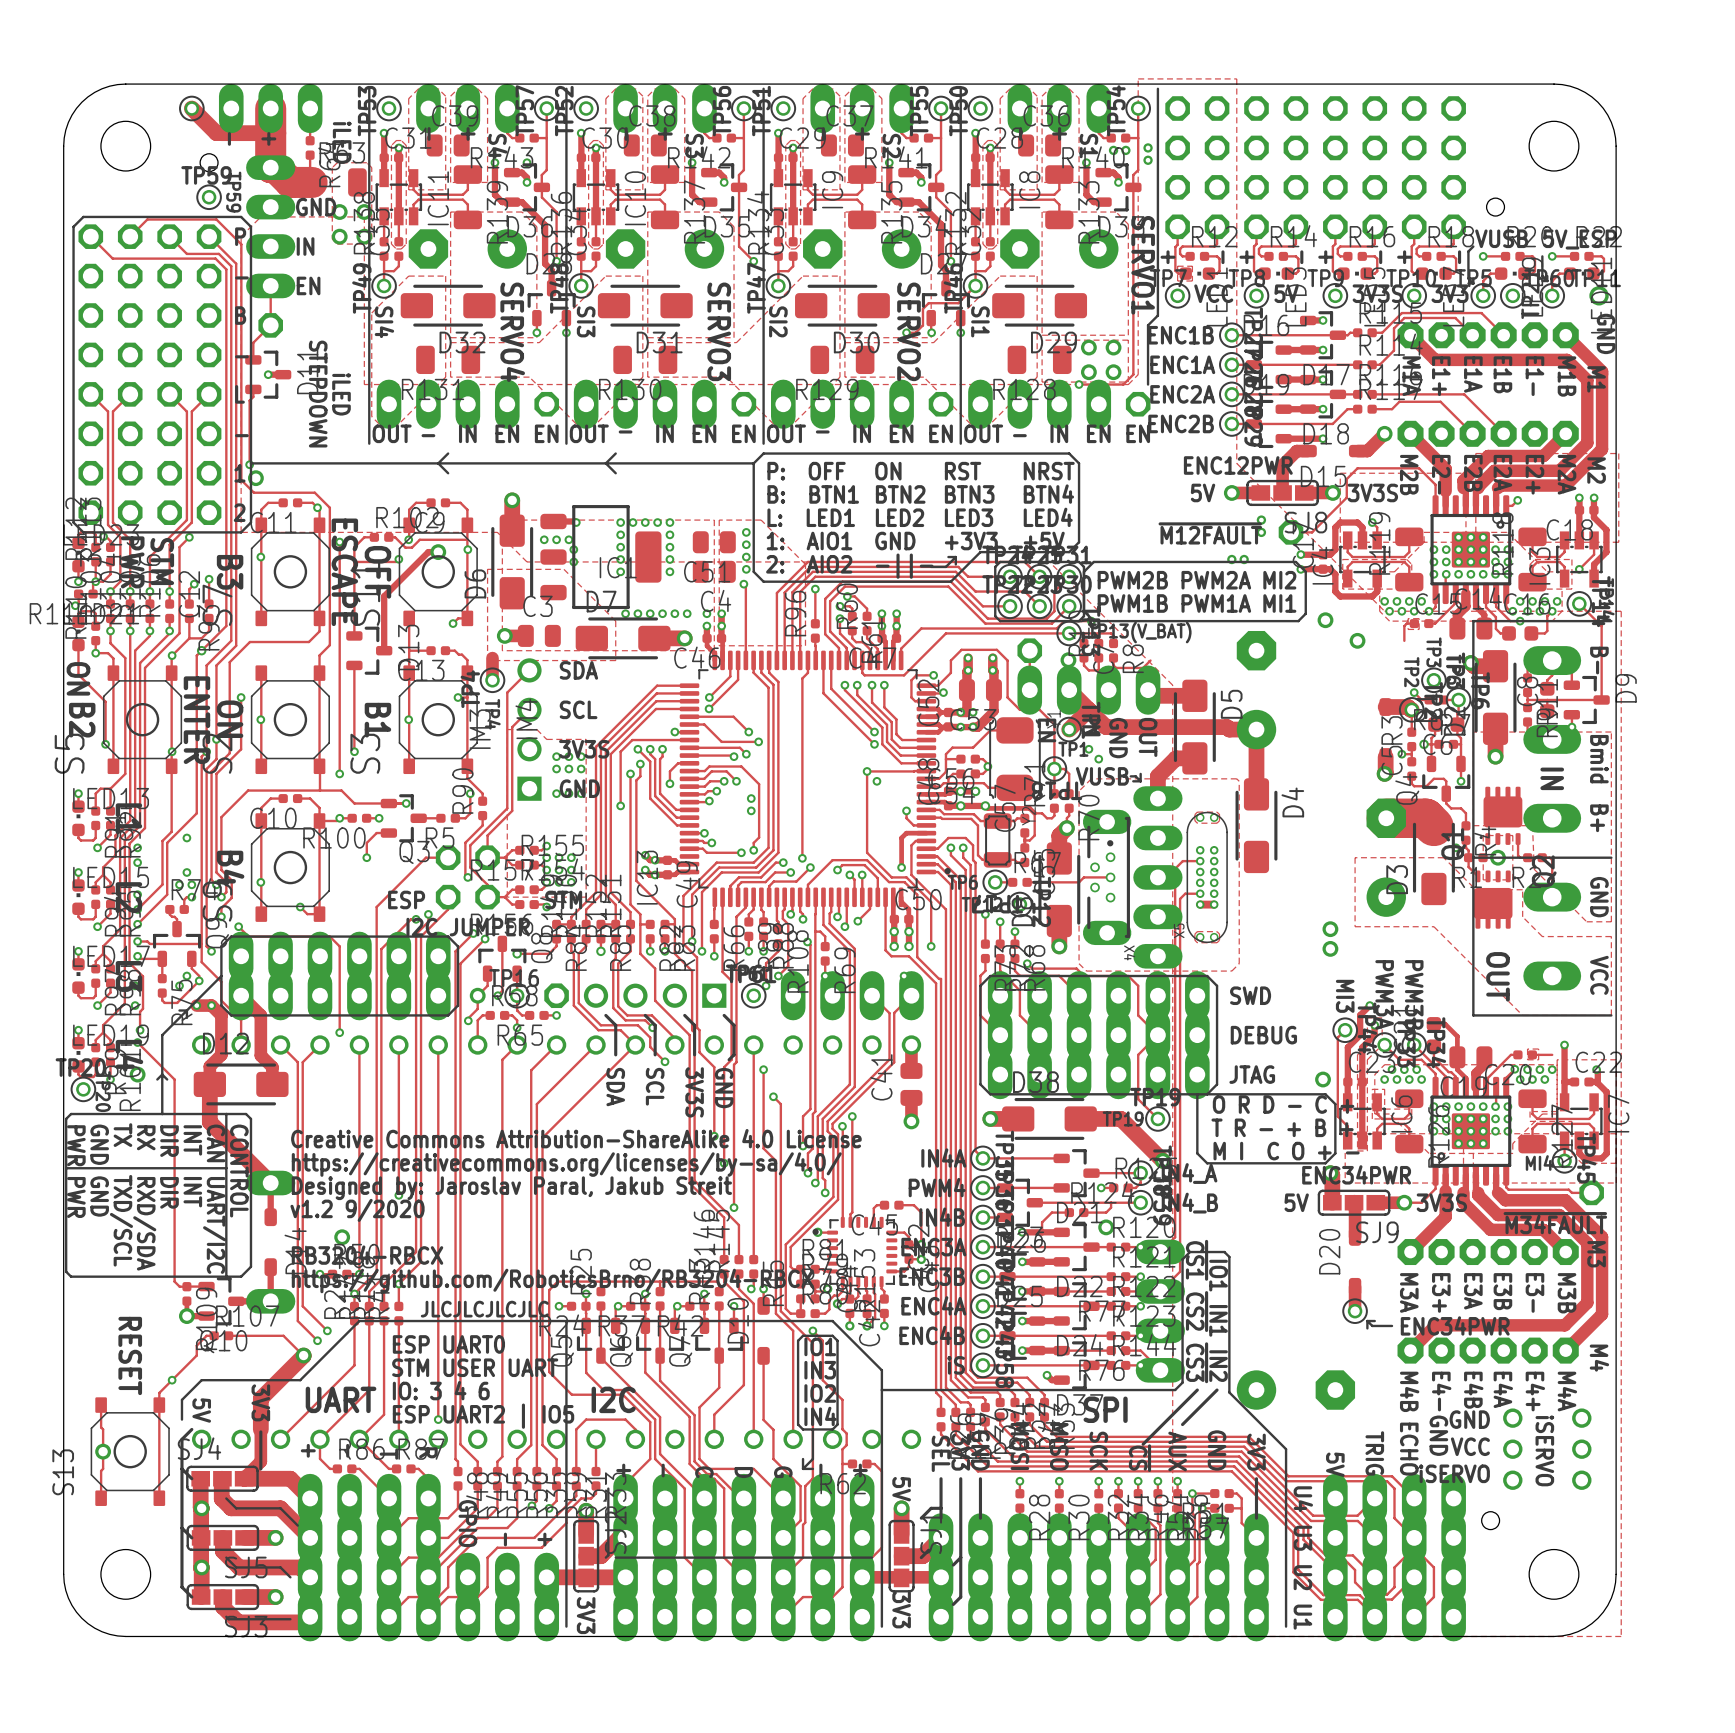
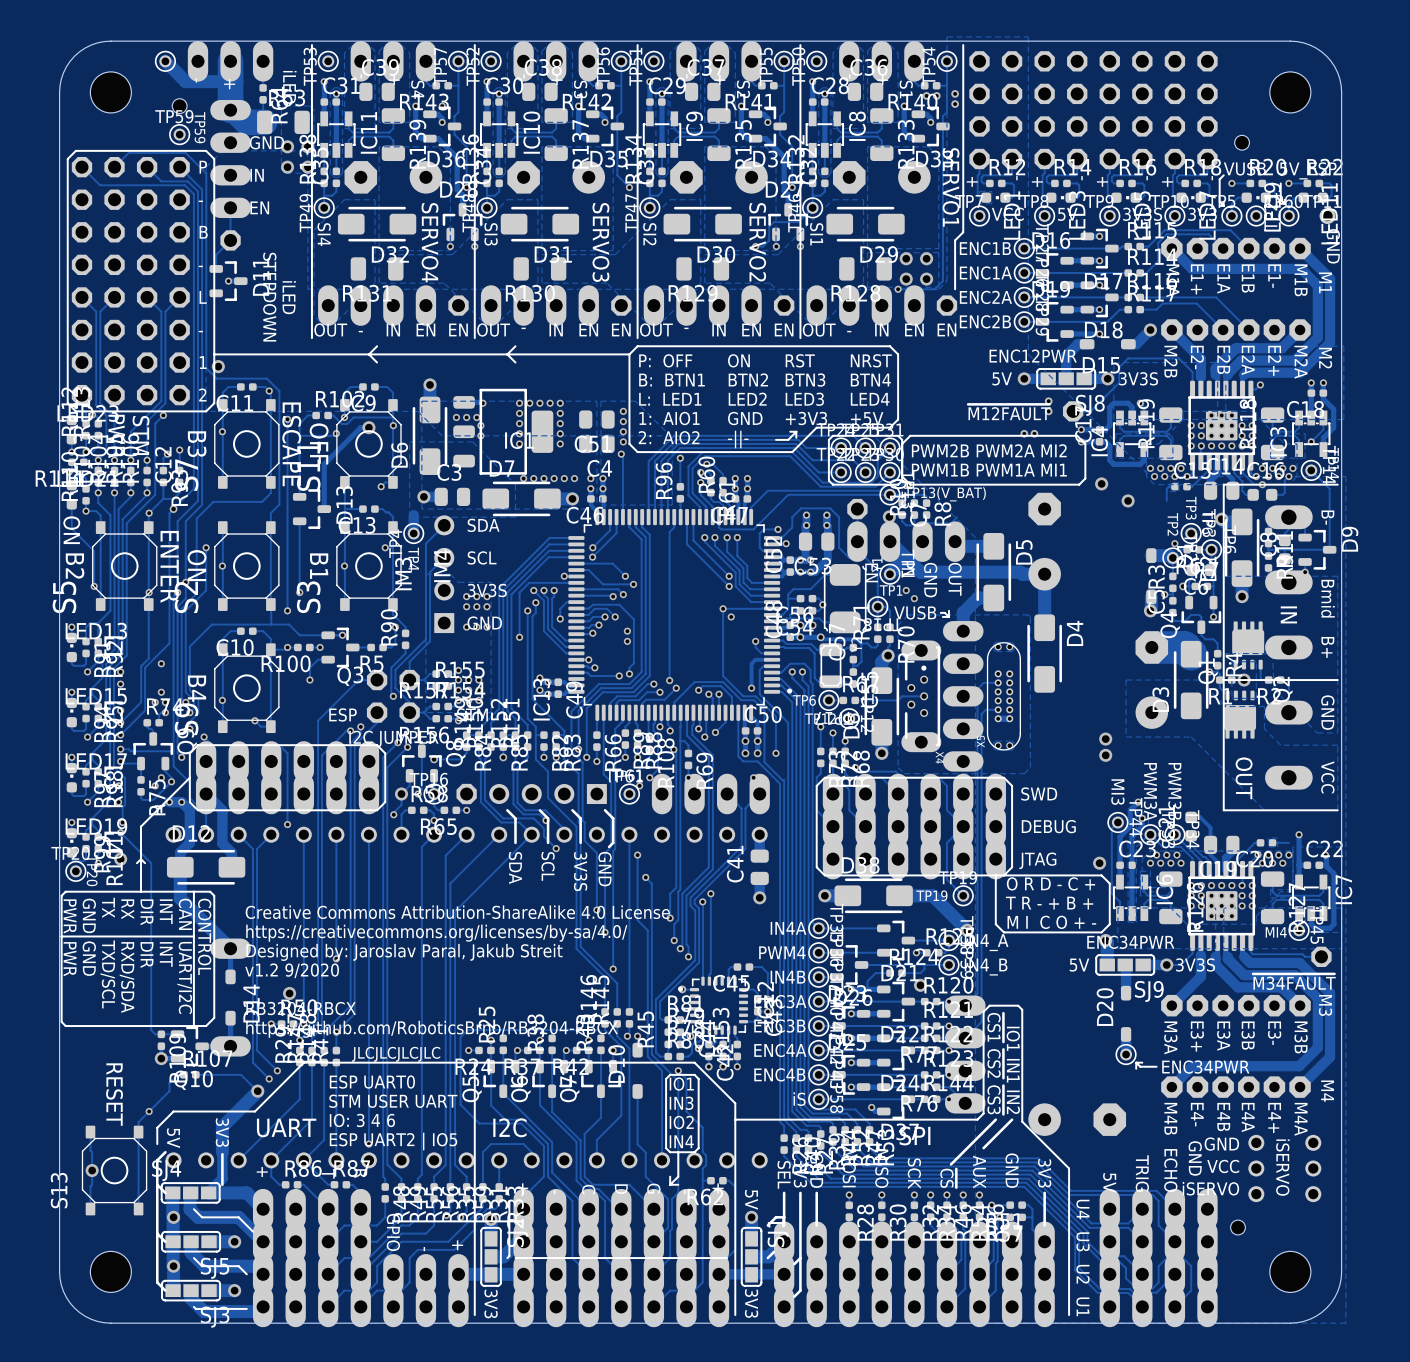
track: (253, 389) (253, 396) (249, 400) (249, 464) -> none
via: (249, 464) -> none

